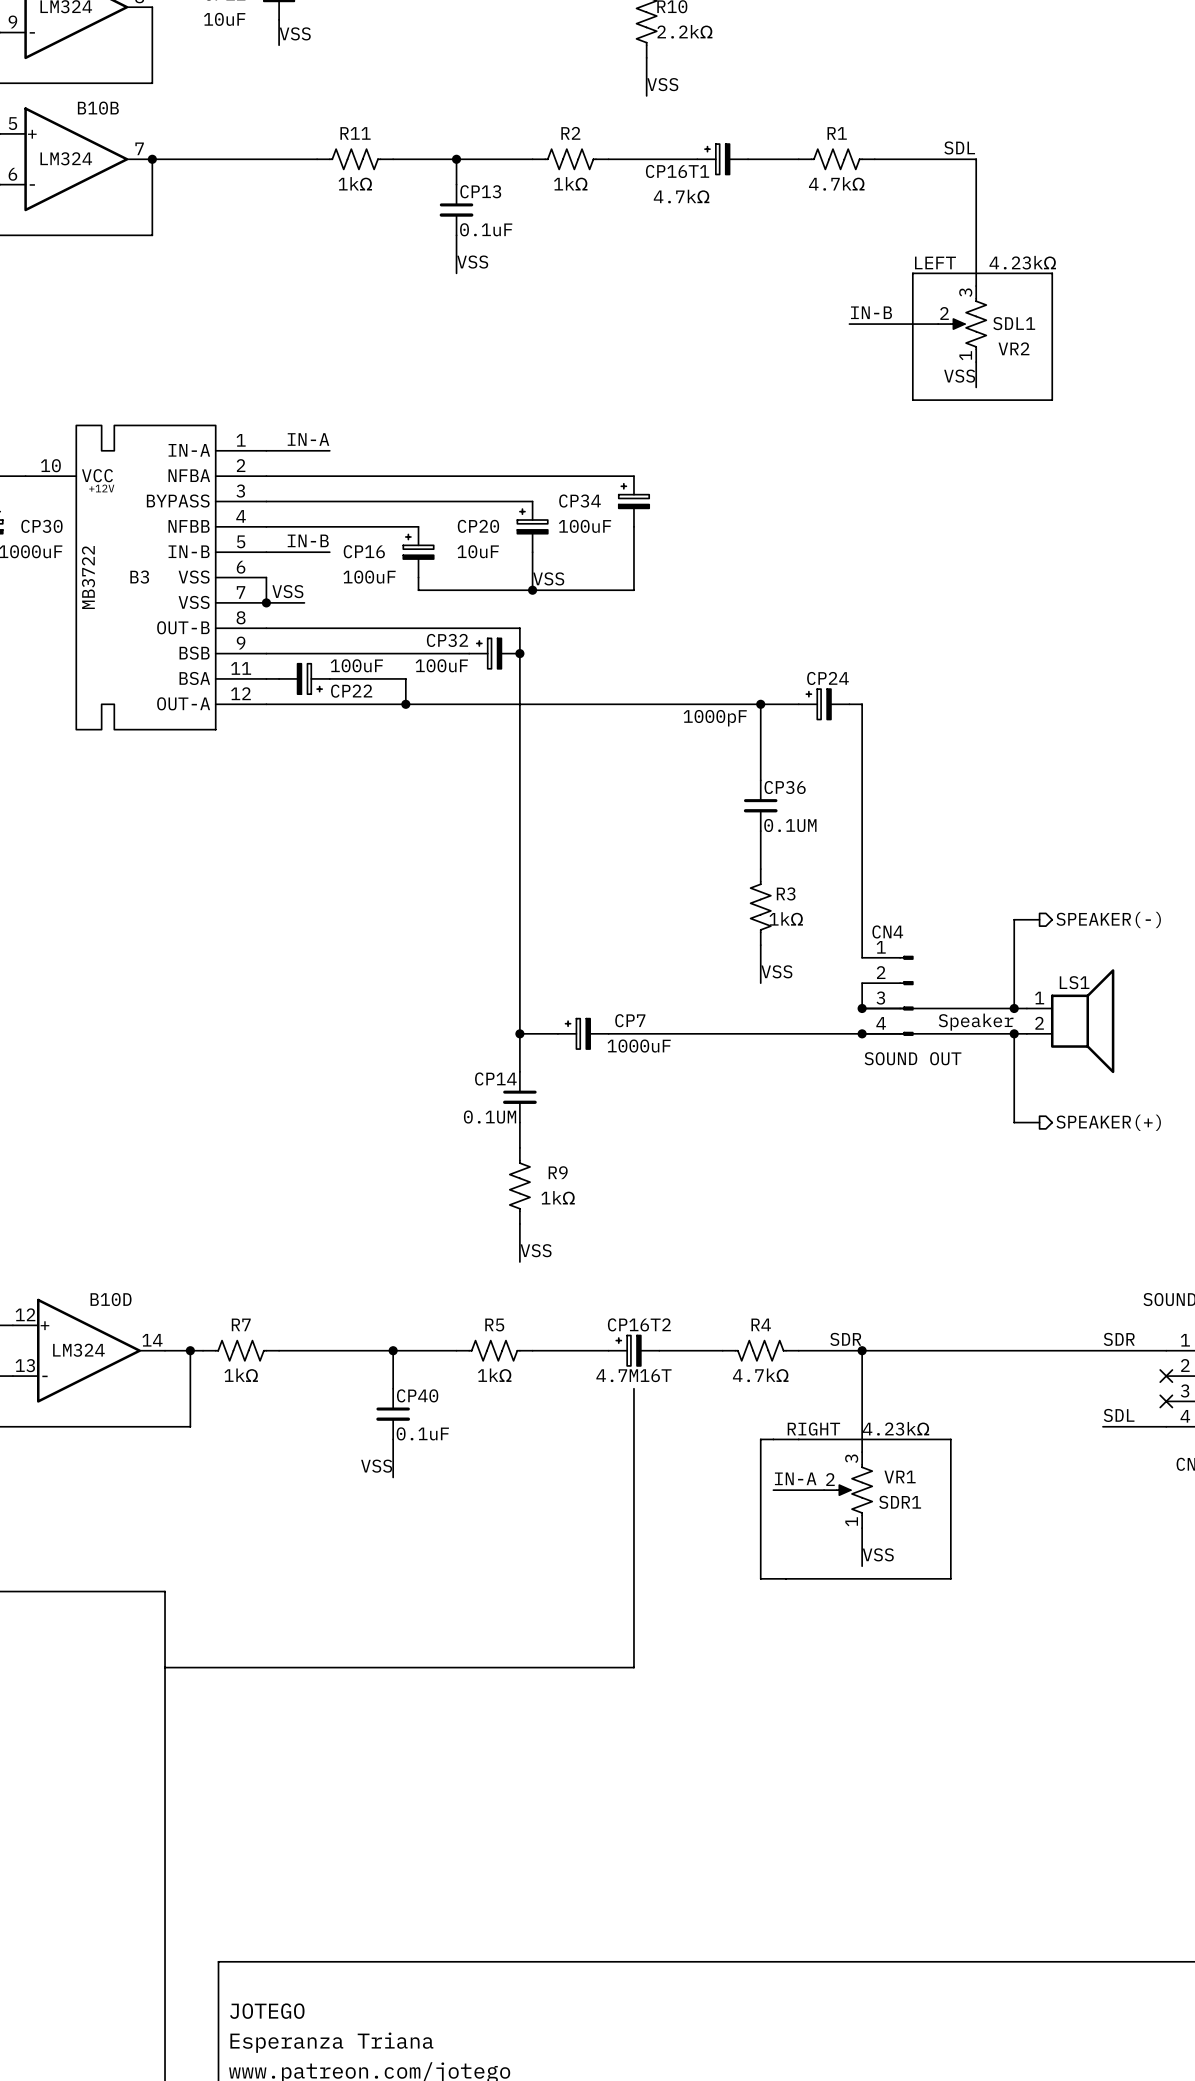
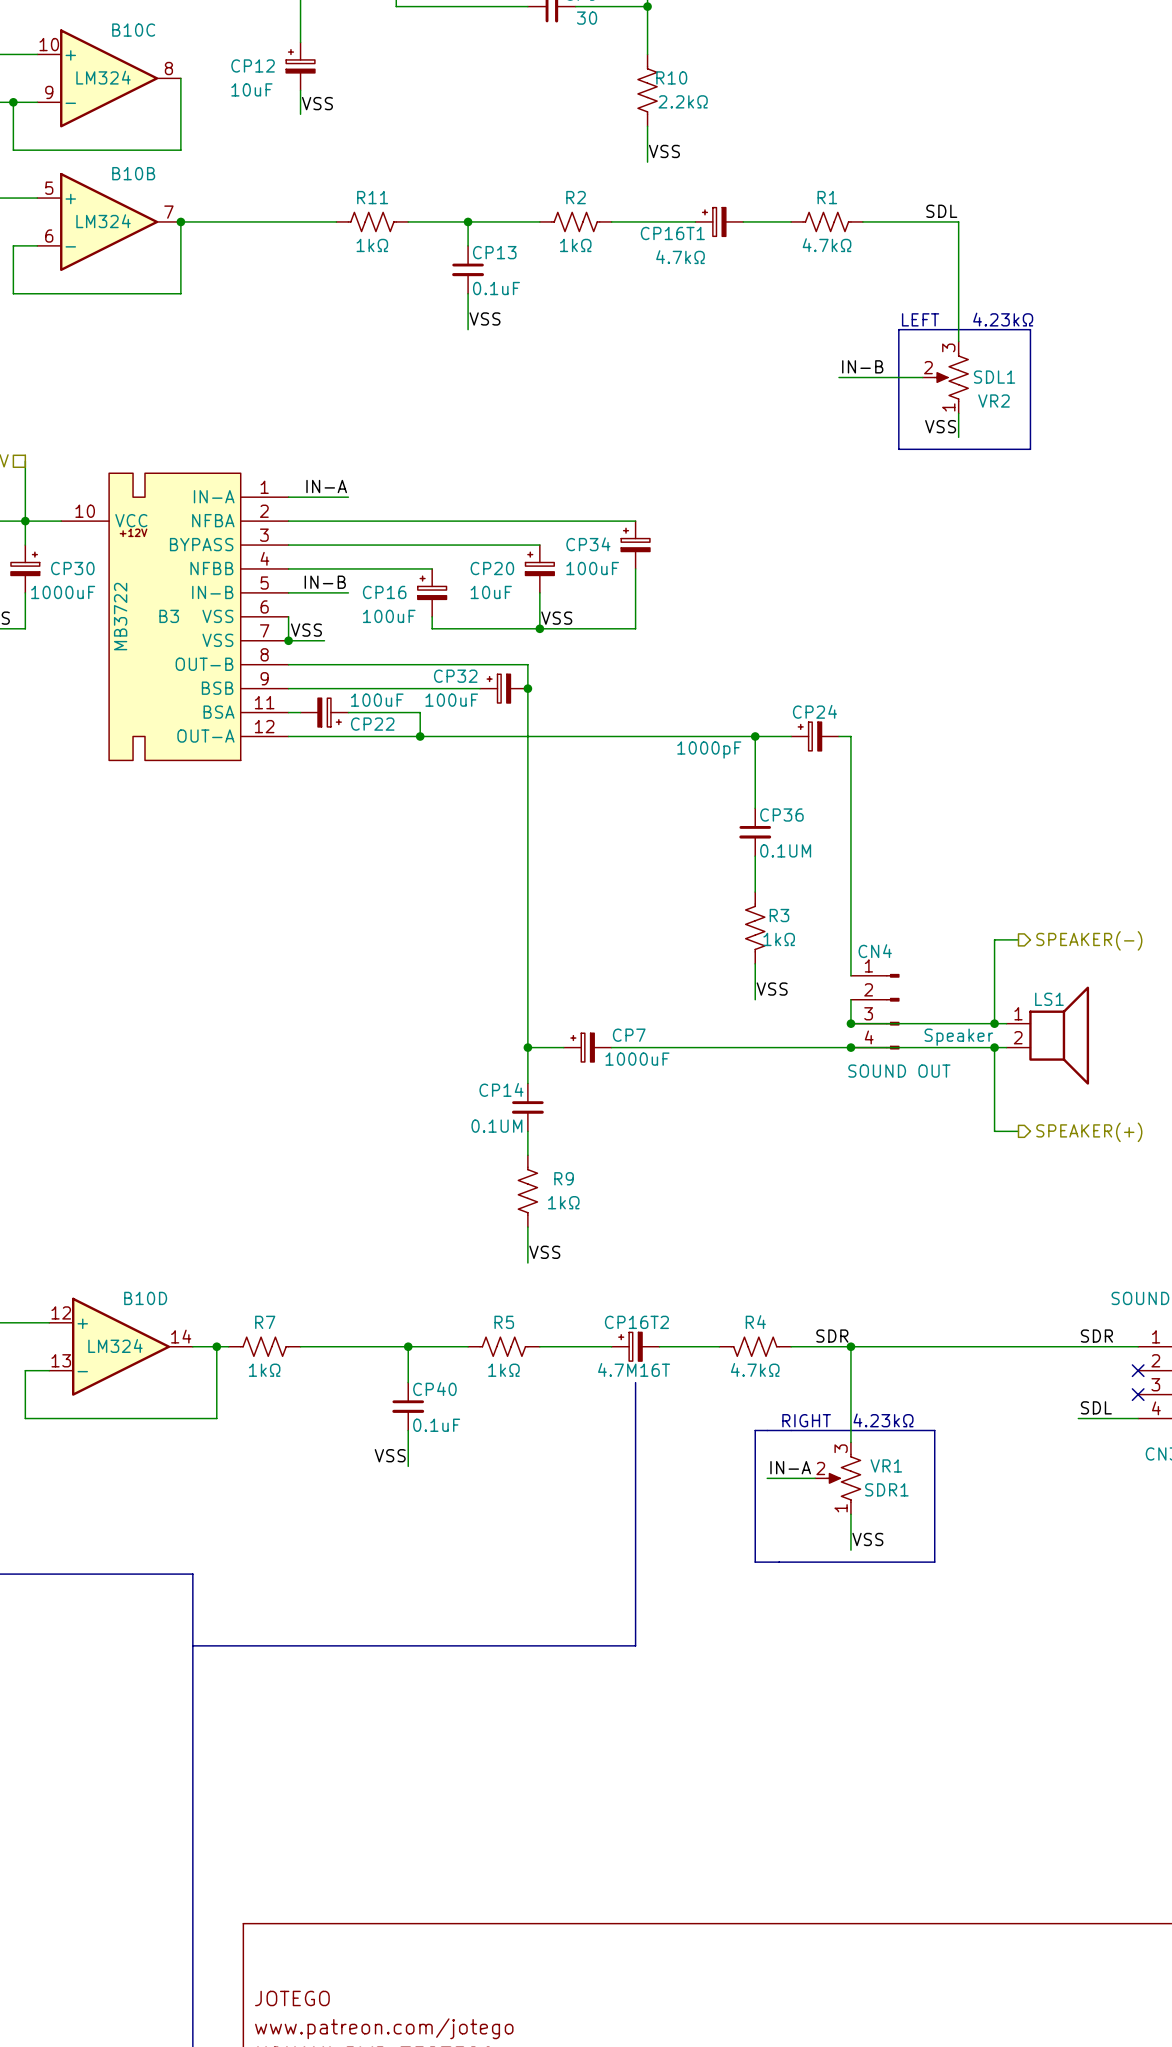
title block: JOTEGO (267, 2011) -> none
title block: Esperanza Triana (331, 2042) -> JOTEGO (292, 1998)

